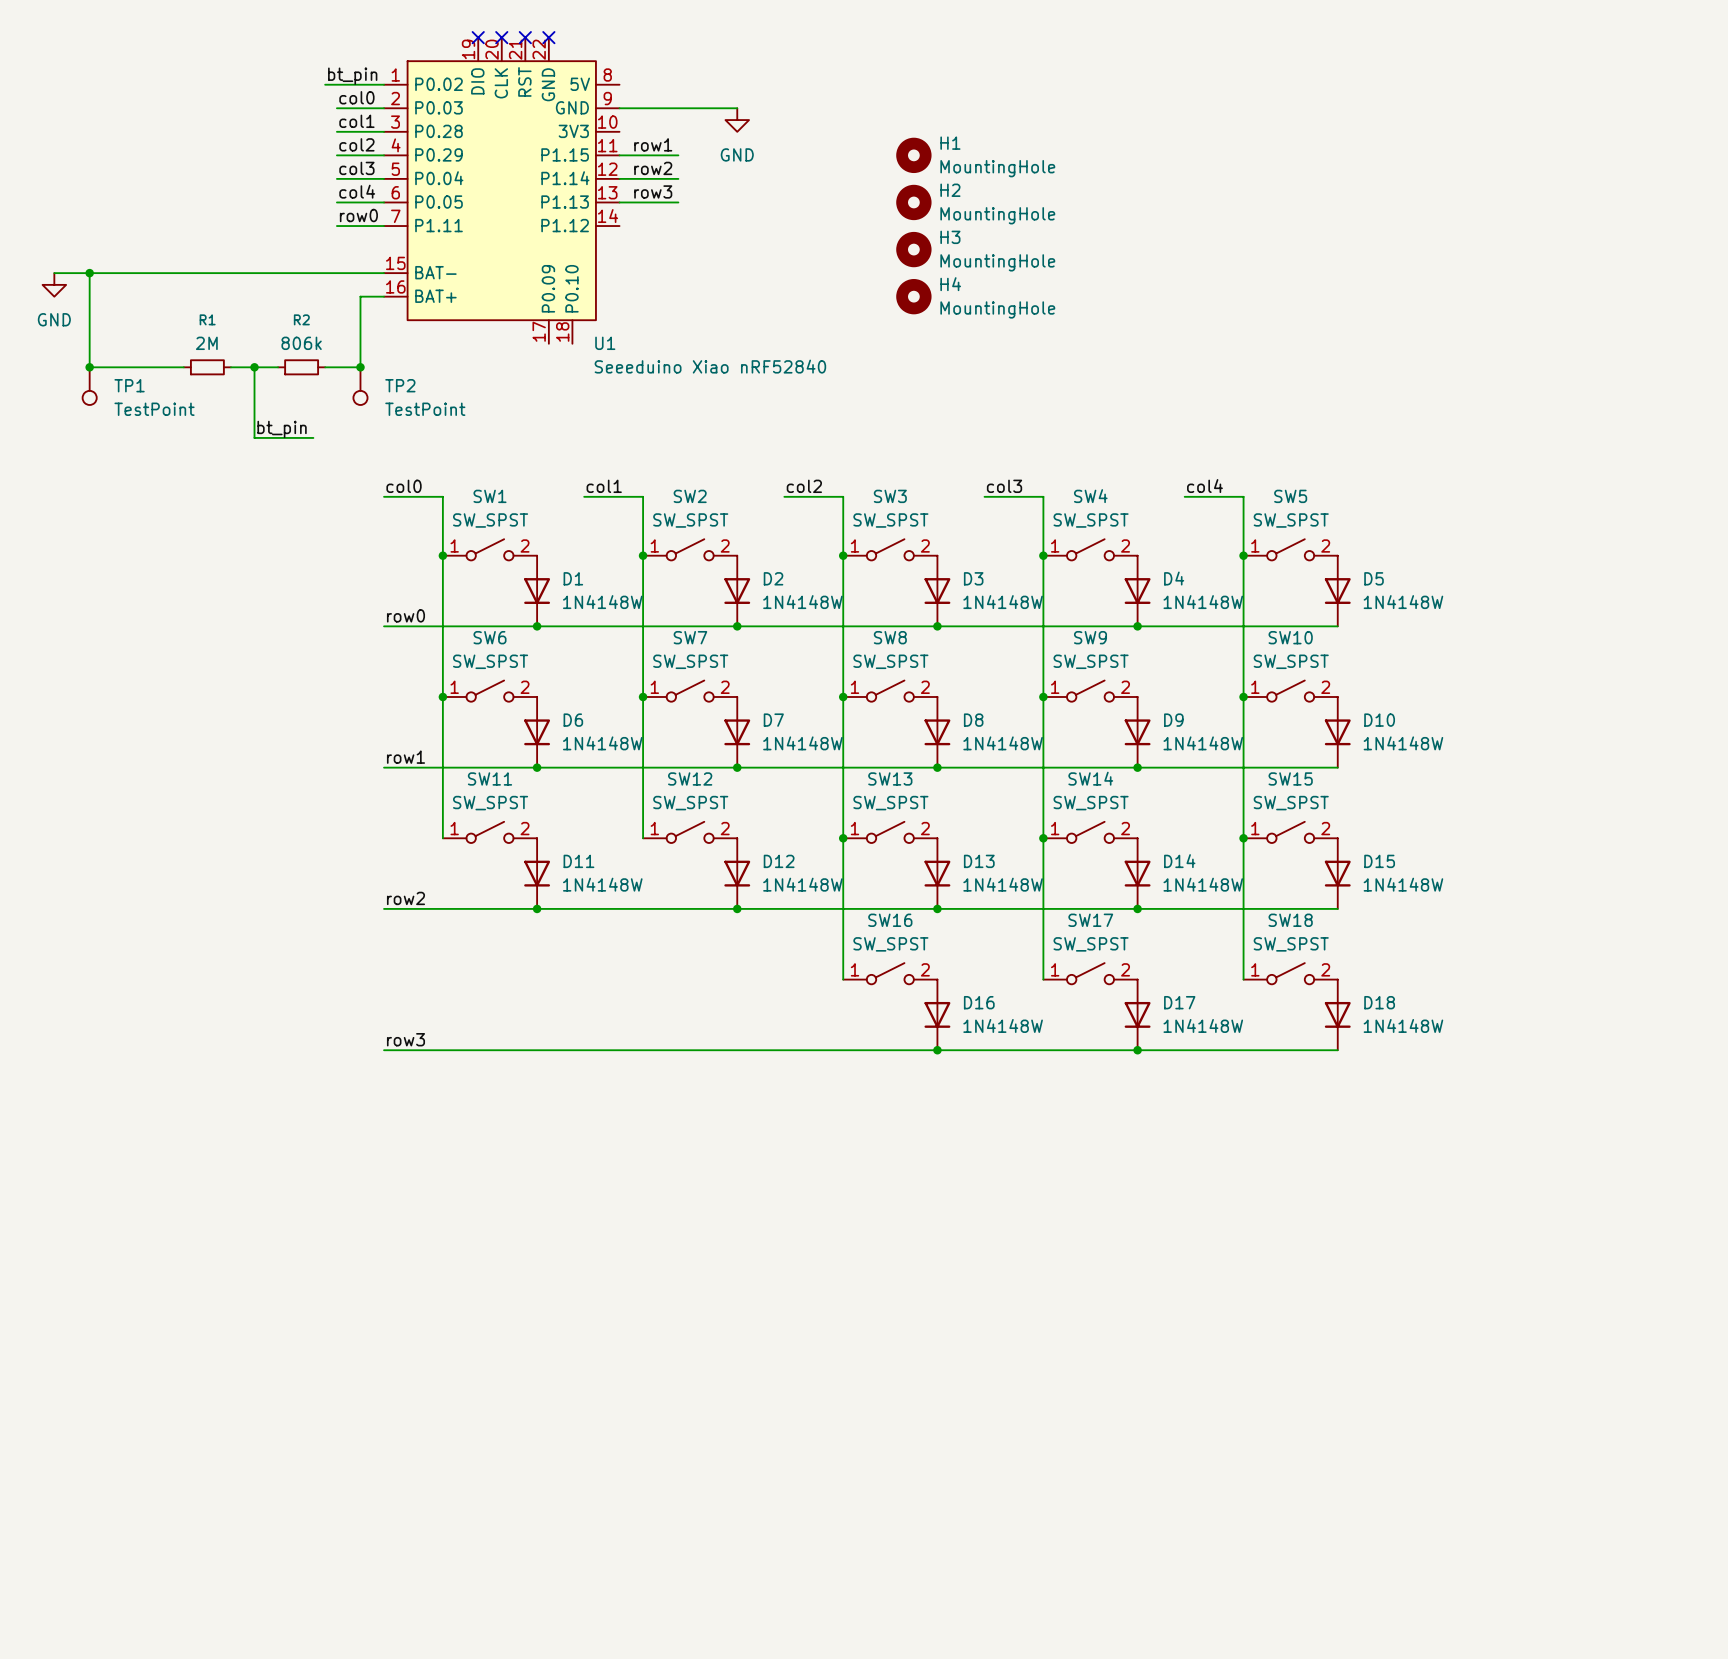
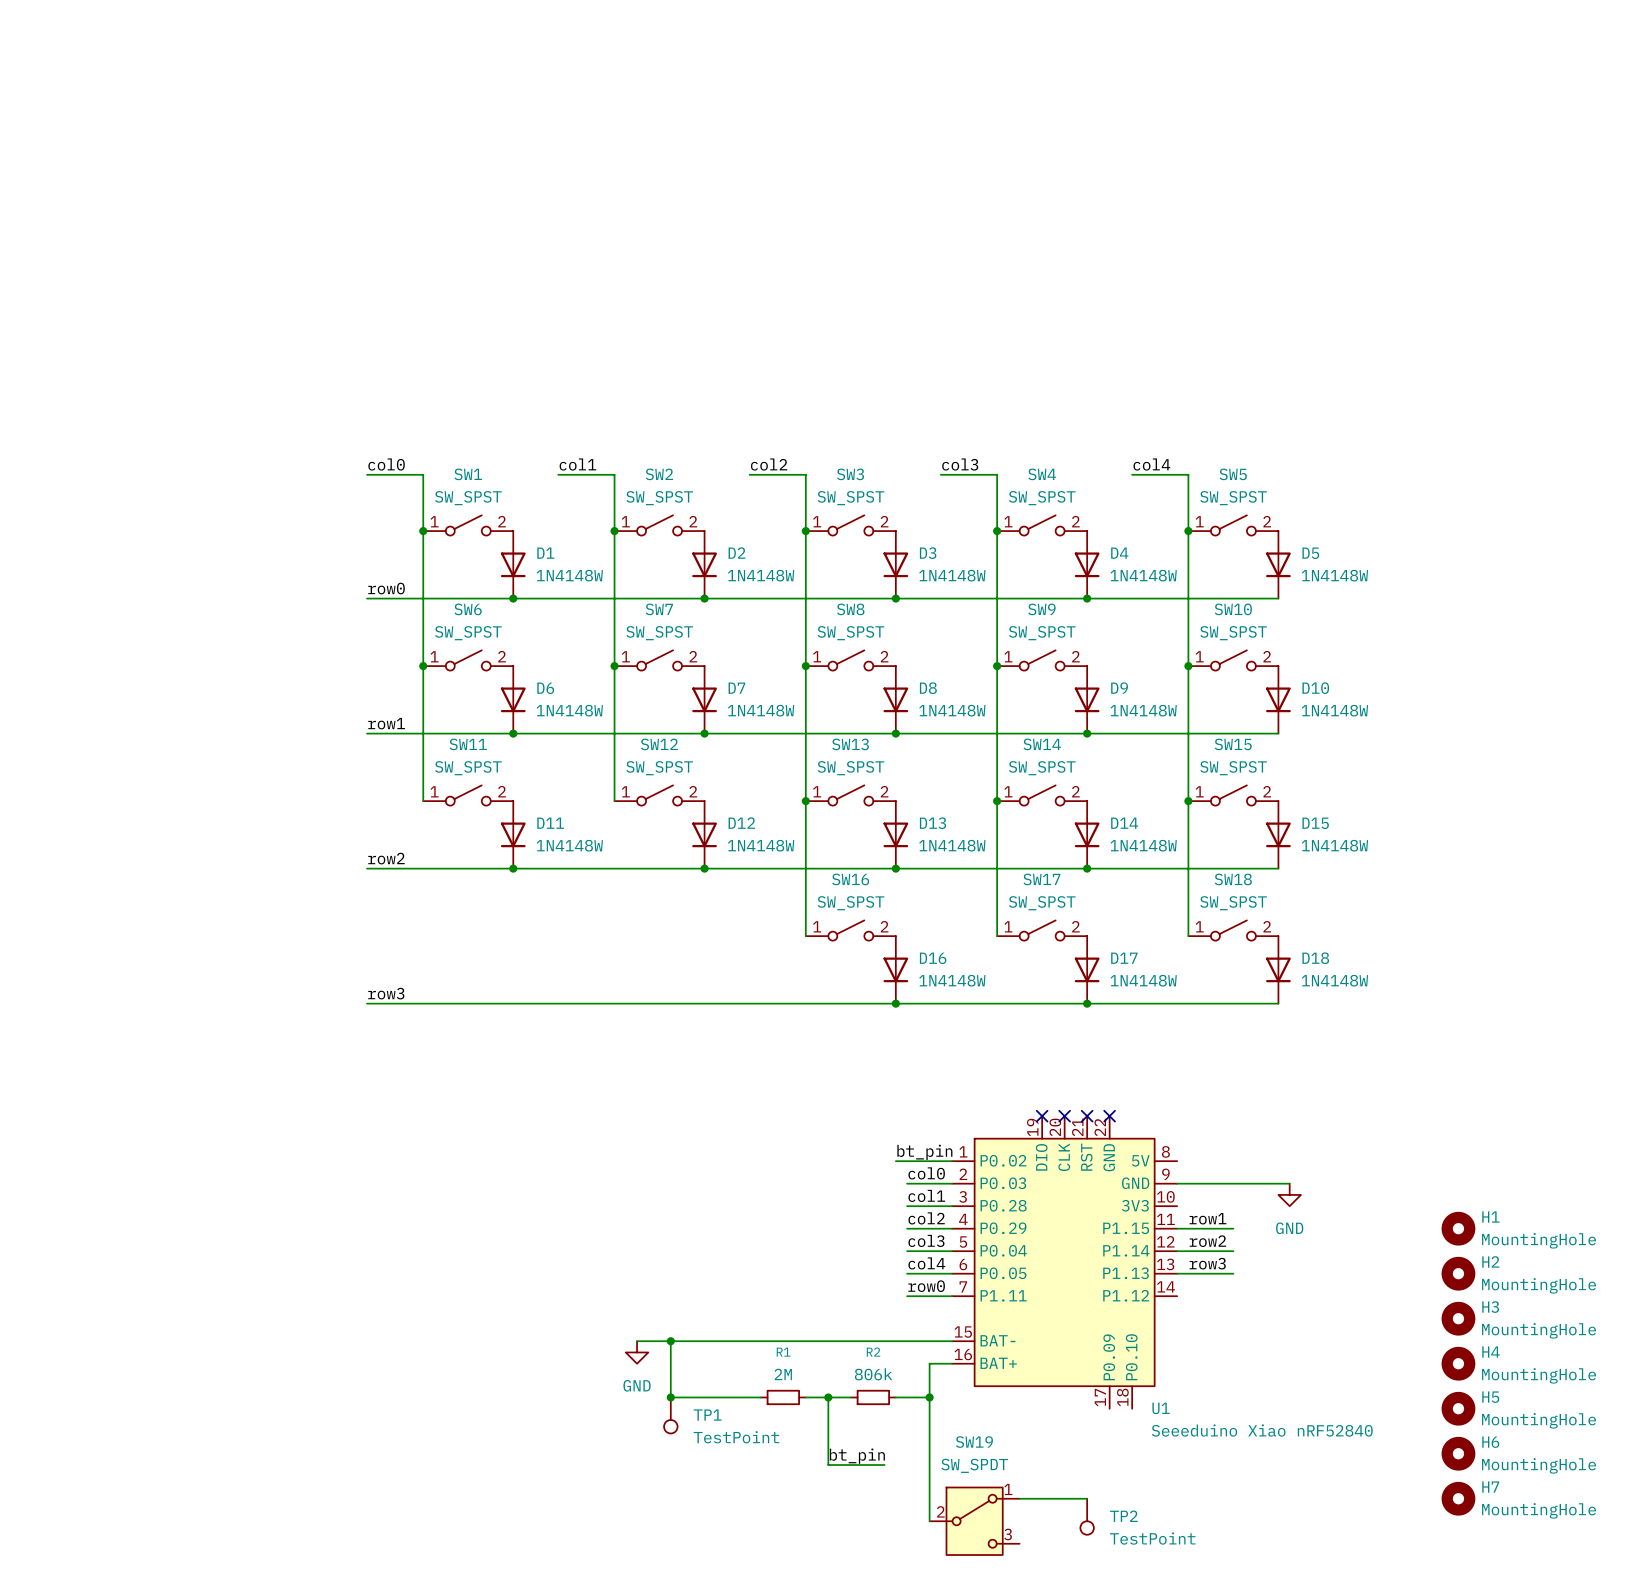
no-connect mark: (478, 37) -> none
no-connect mark: (501, 37) -> none
no-connect mark: (525, 37) -> none
no-connect mark: (548, 37) -> none
label: bt_pin (352, 76) -> none
wire: (325, 84) (384, 84) -> none
label: col0 (356, 97) -> none
wire: (336, 108) (384, 108) -> none
wire: (619, 108) (737, 108) -> none
power symbol: GND (737, 120) -> none
label: col1 (356, 121) -> none
wire: (336, 131) (384, 131) -> none
label: col2 (356, 144) -> none
label: row1 (653, 144) -> none
wire: (336, 155) (384, 155) -> none
wire: (619, 155) (678, 155) -> none
H1 position: (913, 155) -> (1458, 1228)
label: col3 (356, 168) -> none
label: row2 (653, 168) -> none
wire: (336, 178) (384, 178) -> none
wire: (619, 178) (678, 178) -> none
U1 position: (501, 190) -> (1064, 1262)
label: col4 (357, 191) -> none
label: row3 (653, 191) -> none
wire: (336, 202) (384, 202) -> none
wire: (619, 202) (678, 202) -> none
H2 position: (913, 202) -> (1458, 1273)
label: row0 (358, 215) -> none
wire: (336, 226) (384, 226) -> none
H3 position: (913, 249) -> (1458, 1318)
wire: (54, 273) (384, 273) -> none
wire: (89, 273) (89, 367) (183, 367) -> none
junction: (89, 273) -> none
power symbol: GND (54, 284) -> none
wire: (384, 296) (360, 296) (360, 367) (325, 367) -> none
H4 position: (913, 296) -> (1458, 1363)
junction: (89, 367) -> none
R1 position: (207, 367) -> (783, 1397)
wire: (230, 367) (278, 367) -> none
wire: (254, 367) (254, 437) (313, 437) -> none
junction: (254, 367) -> none
R2 position: (301, 367) -> (873, 1397)
junction: (360, 367) -> none
TP1 position: (89, 386) -> (670, 1415)
TP2 position: (360, 386) -> (1087, 1516)
label: bt_pin (282, 429) -> none
no-connect mark: none -> (1042, 1116)
no-connect mark: none -> (1064, 1116)
no-connect mark: none -> (1087, 1116)
no-connect mark: none -> (1109, 1116)
label: none -> bt_pin (924, 1152)
wire: none -> (895, 1161) (952, 1161)
label: none -> col0 (926, 1173)
wire: none -> (907, 1183) (952, 1183)
wire: none -> (1177, 1183) (1289, 1183)
power symbol: none -> GND (1289, 1194)
label: none -> col1 (926, 1195)
wire: none -> (907, 1206) (952, 1206)
label: none -> col2 (926, 1218)
label: none -> row1 (1207, 1218)
wire: none -> (907, 1228) (952, 1228)
wire: none -> (1177, 1228) (1233, 1228)
label: none -> col3 (926, 1240)
label: none -> row2 (1207, 1241)
wire: none -> (907, 1251) (952, 1251)
wire: none -> (1177, 1251) (1233, 1251)
label: none -> col4 (926, 1263)
label: none -> row3 (1207, 1263)
wire: none -> (907, 1273) (952, 1273)
wire: none -> (1177, 1273) (1233, 1273)
label: none -> row0 (926, 1286)
wire: none -> (907, 1296) (952, 1296)
wire: none -> (637, 1341) (952, 1341)
wire: none -> (670, 1341) (670, 1397) (760, 1397)
junction: none -> (670, 1341)
power symbol: none -> GND (637, 1352)
wire: none -> (952, 1363) (929, 1363) (929, 1521)
junction: none -> (670, 1397)
wire: none -> (805, 1397) (850, 1397)
wire: none -> (828, 1397) (828, 1464) (884, 1464)
junction: none -> (828, 1397)
wire: none -> (895, 1397) (929, 1397)
junction: none -> (929, 1397)
H5: none -> MountingHole (1458, 1408)
H6: none -> MountingHole (1458, 1453)
label: none -> bt_pin (857, 1456)
wire: none -> (1019, 1498) (1087, 1498)
H7: none -> MountingHole (1458, 1498)
SW19: none -> SW_SPDT (974, 1521)

